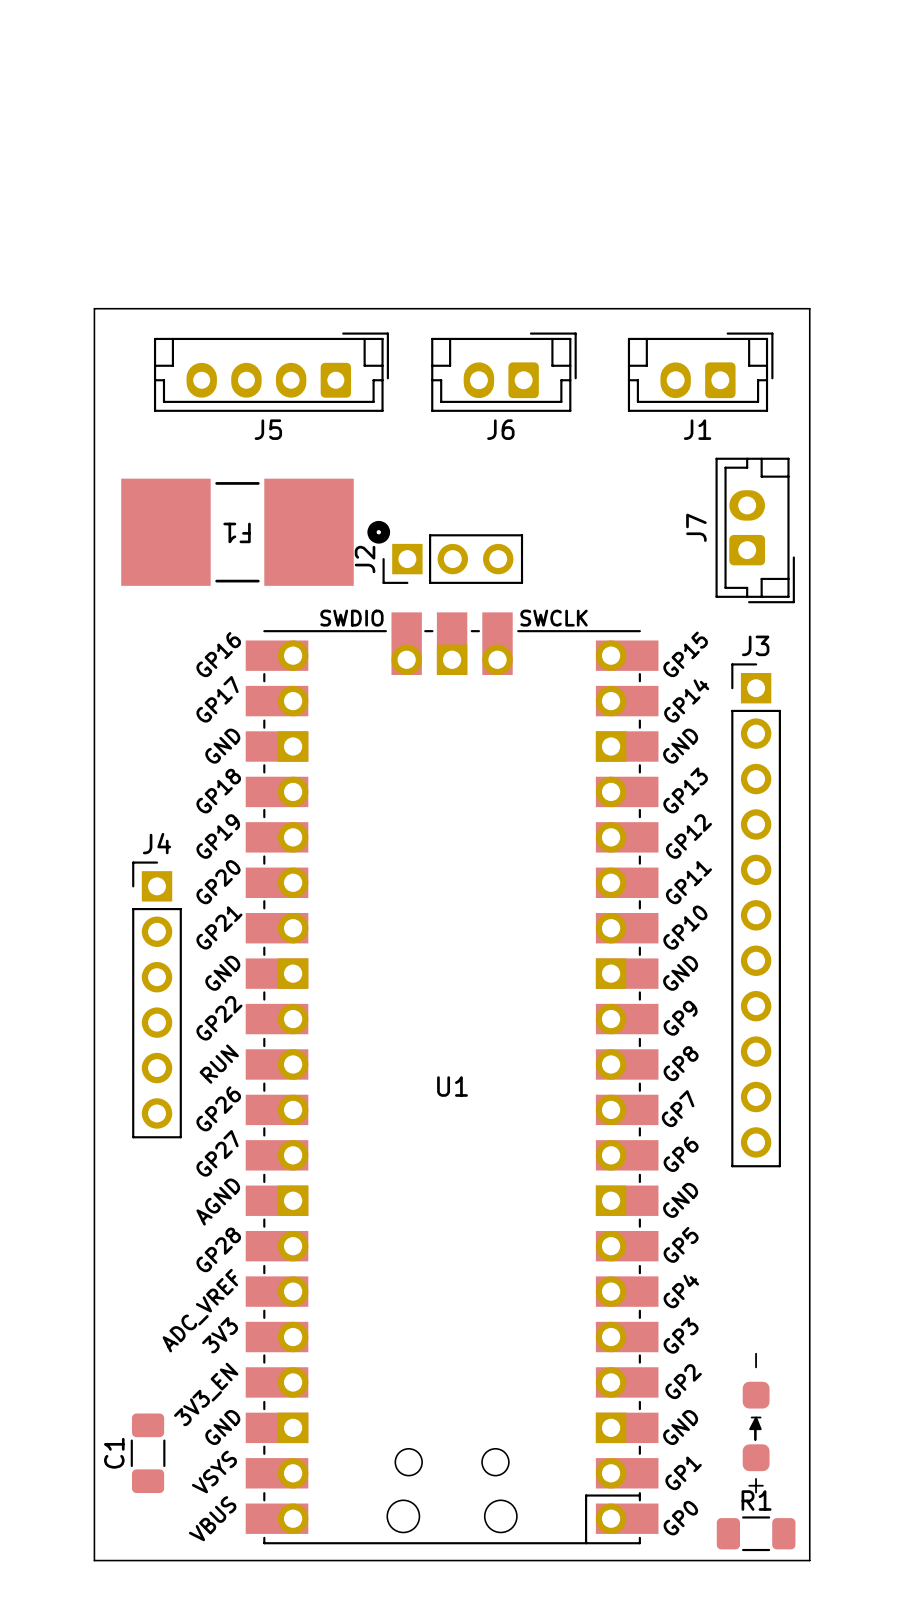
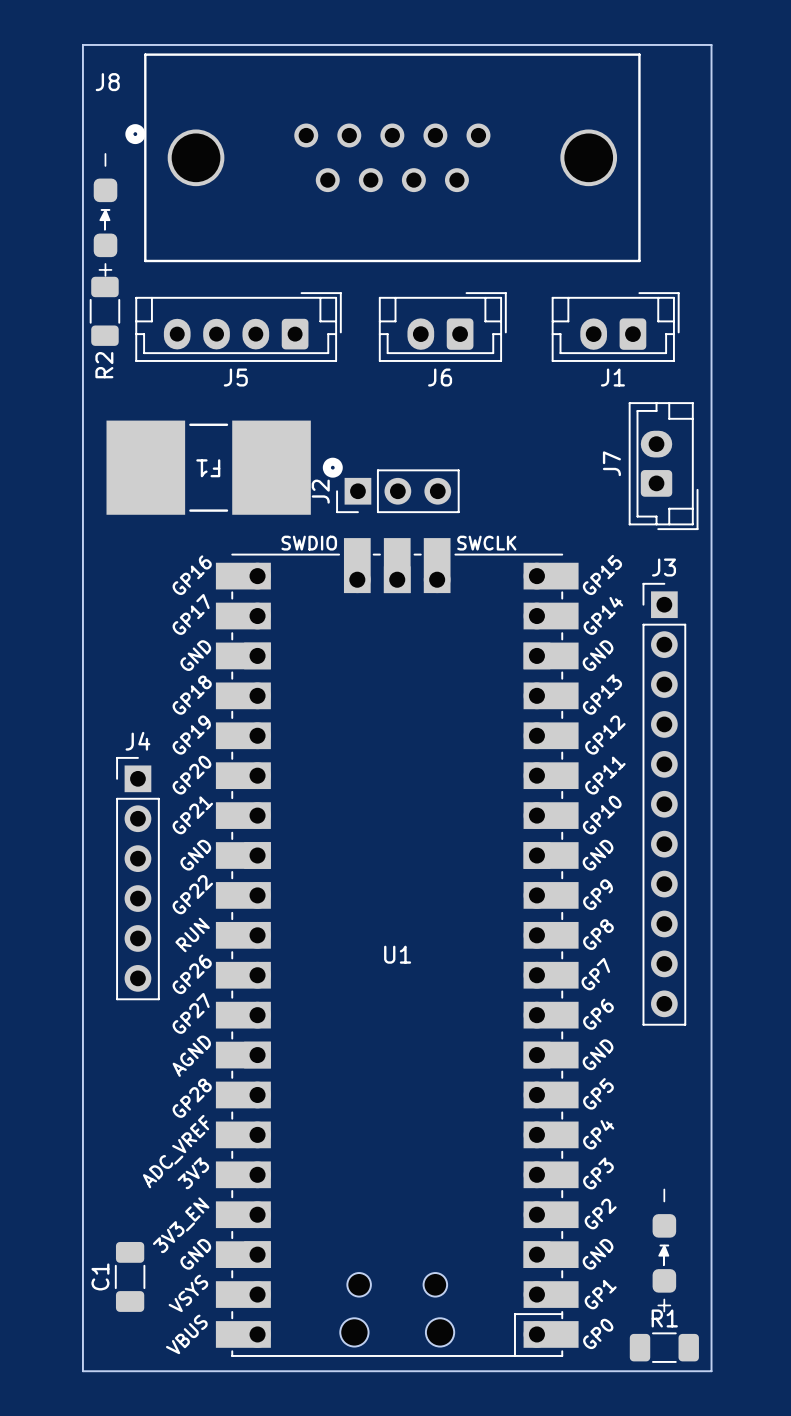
J8: none -> (382, 157)
part: none -> (105, 217)
board edge: (94, 308) (809, 308) -> (82, 271) (82, 44) (711, 44) (711, 271)
R2: none -> (104, 311)

